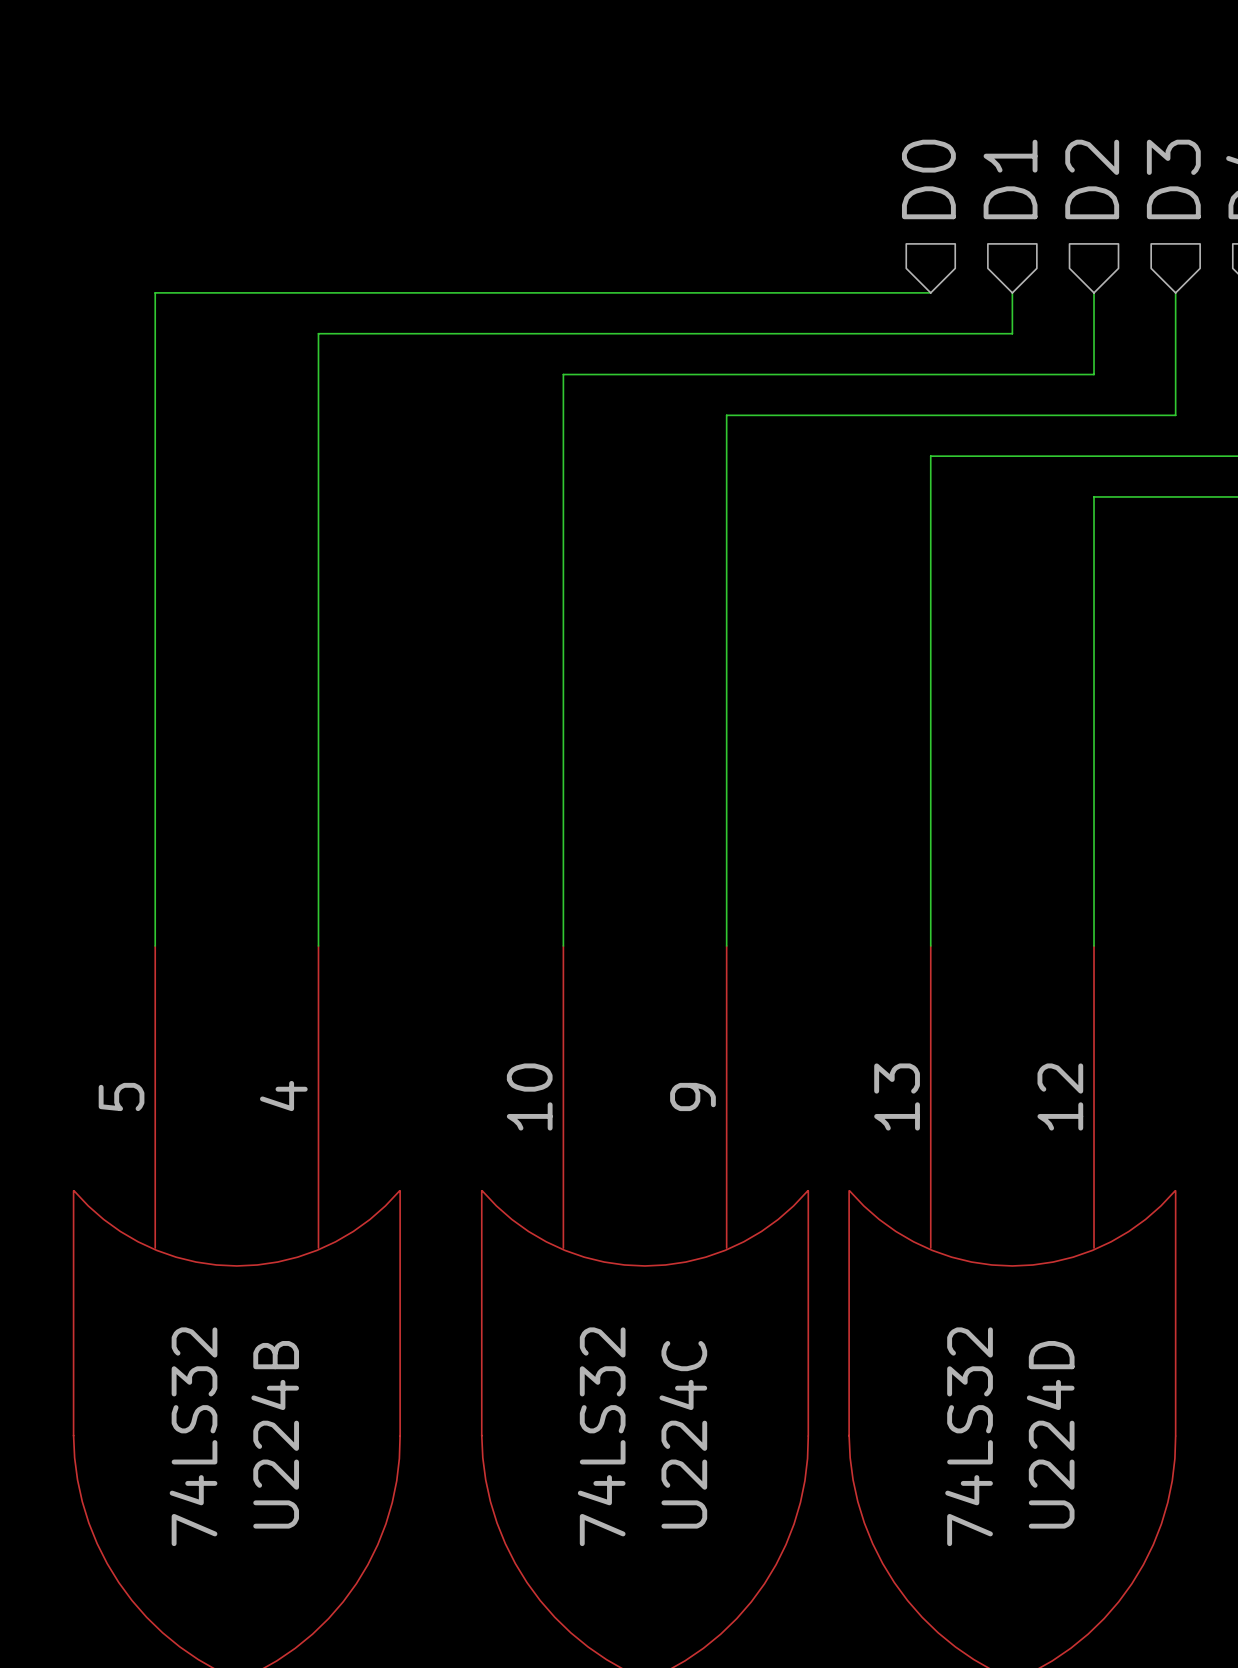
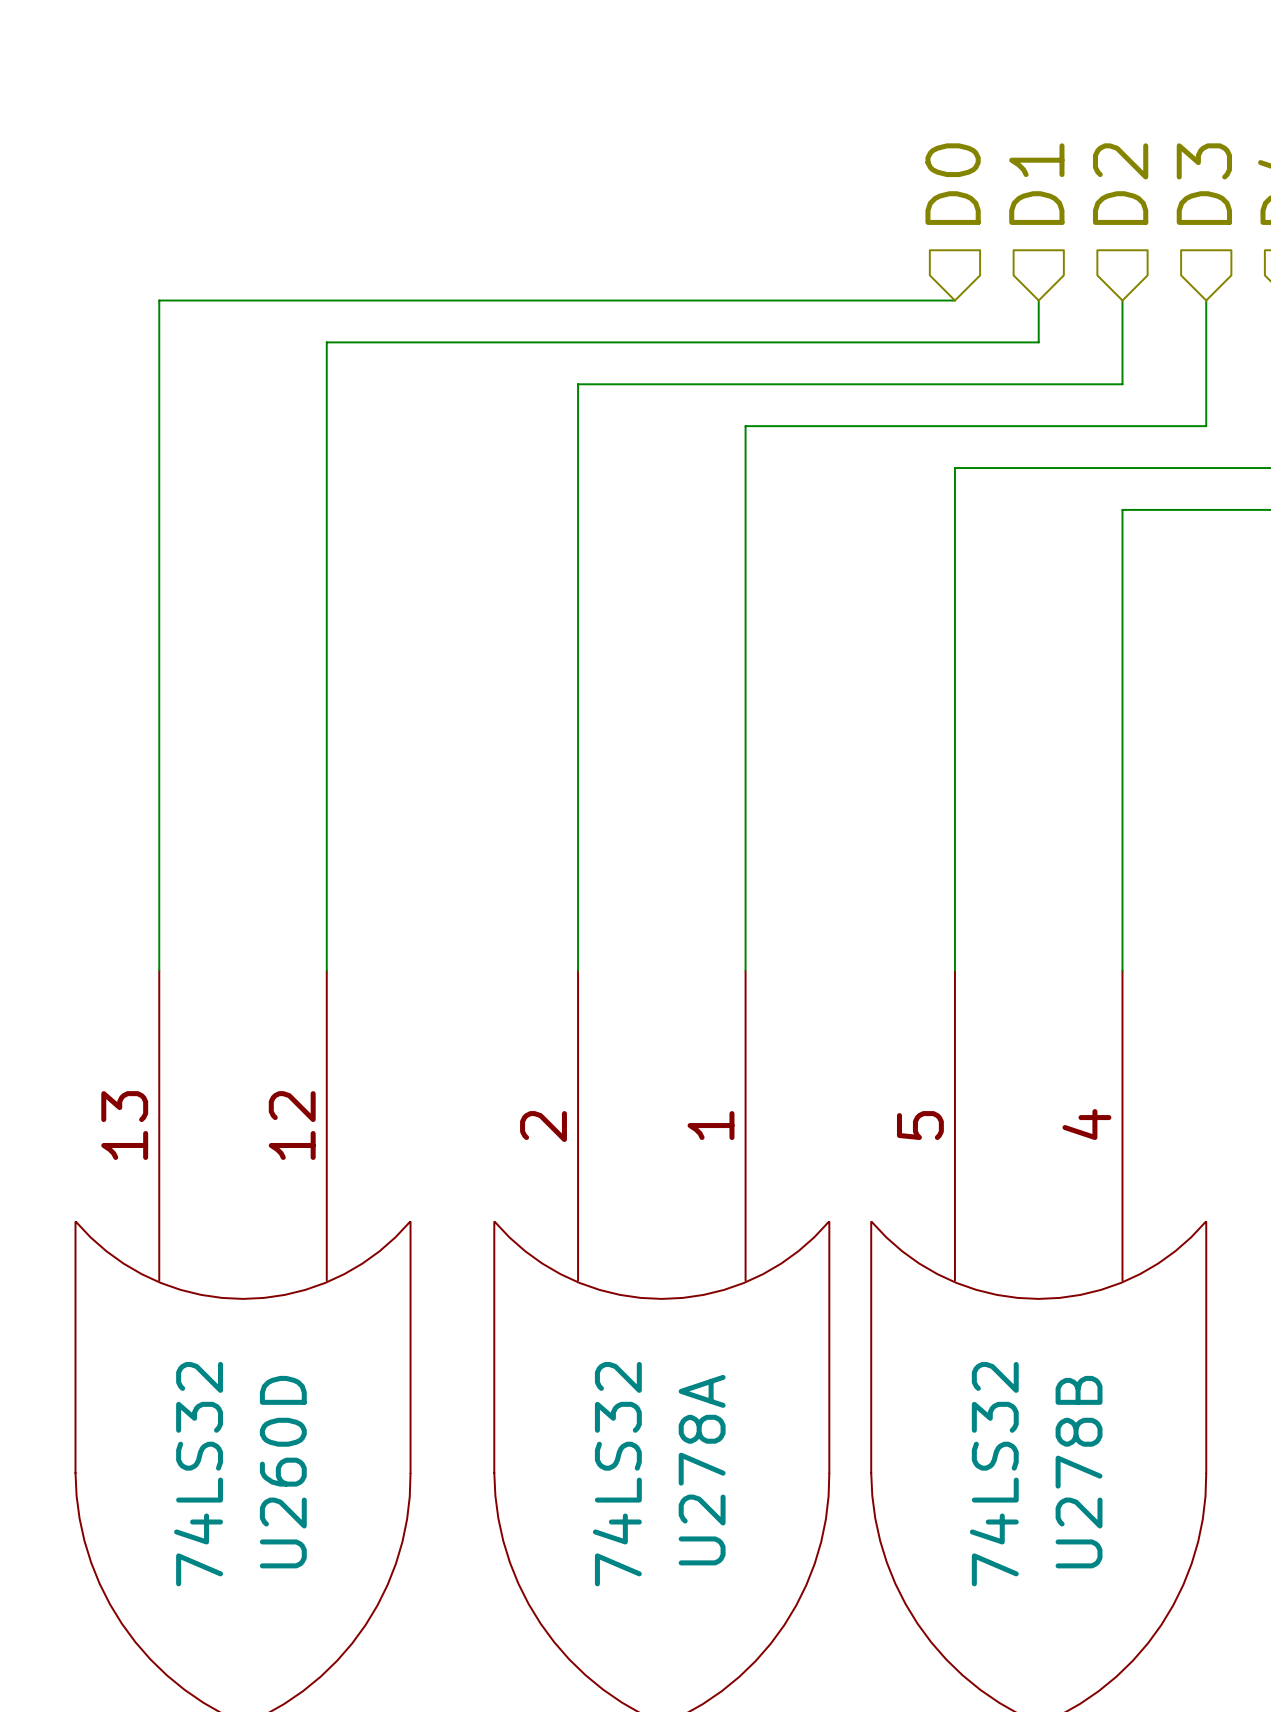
U224B pin number: 5 (121, 1096) -> 13 (124, 1125)
U224B pin number: 4 (283, 1096) -> 12 (292, 1125)
U224C pin number: 10 (529, 1096) -> 2 (543, 1126)
U224C pin number: 9 (692, 1096) -> 1 (711, 1125)
U224D pin number: 13 (897, 1096) -> 5 (920, 1125)
U224D pin number: 12 (1060, 1096) -> 4 (1086, 1124)
U224B name: U224B (275, 1434) -> U260D (283, 1472)
U224C name: U224C (683, 1434) -> U278A (702, 1470)
U224D name: U224D (1050, 1434) -> U278B (1079, 1472)

